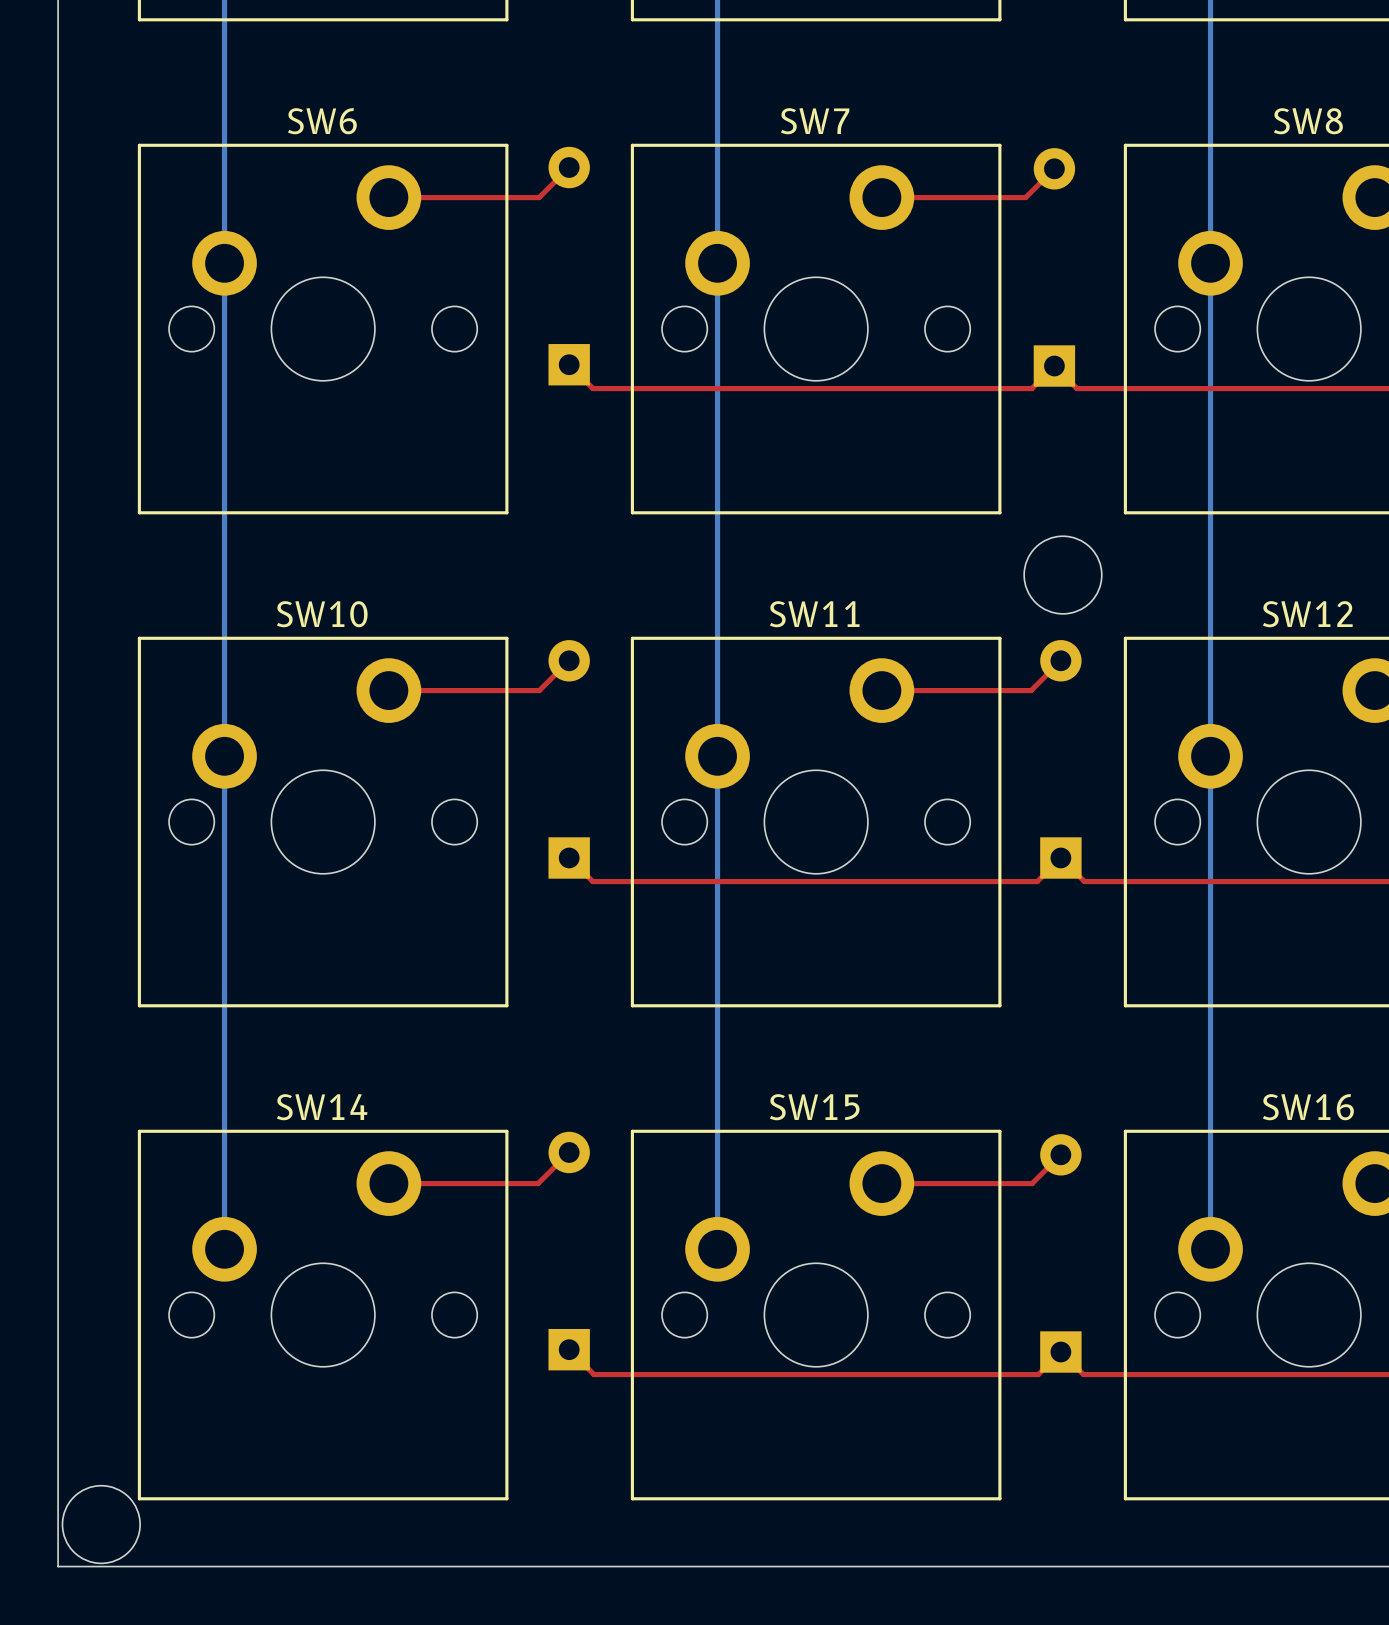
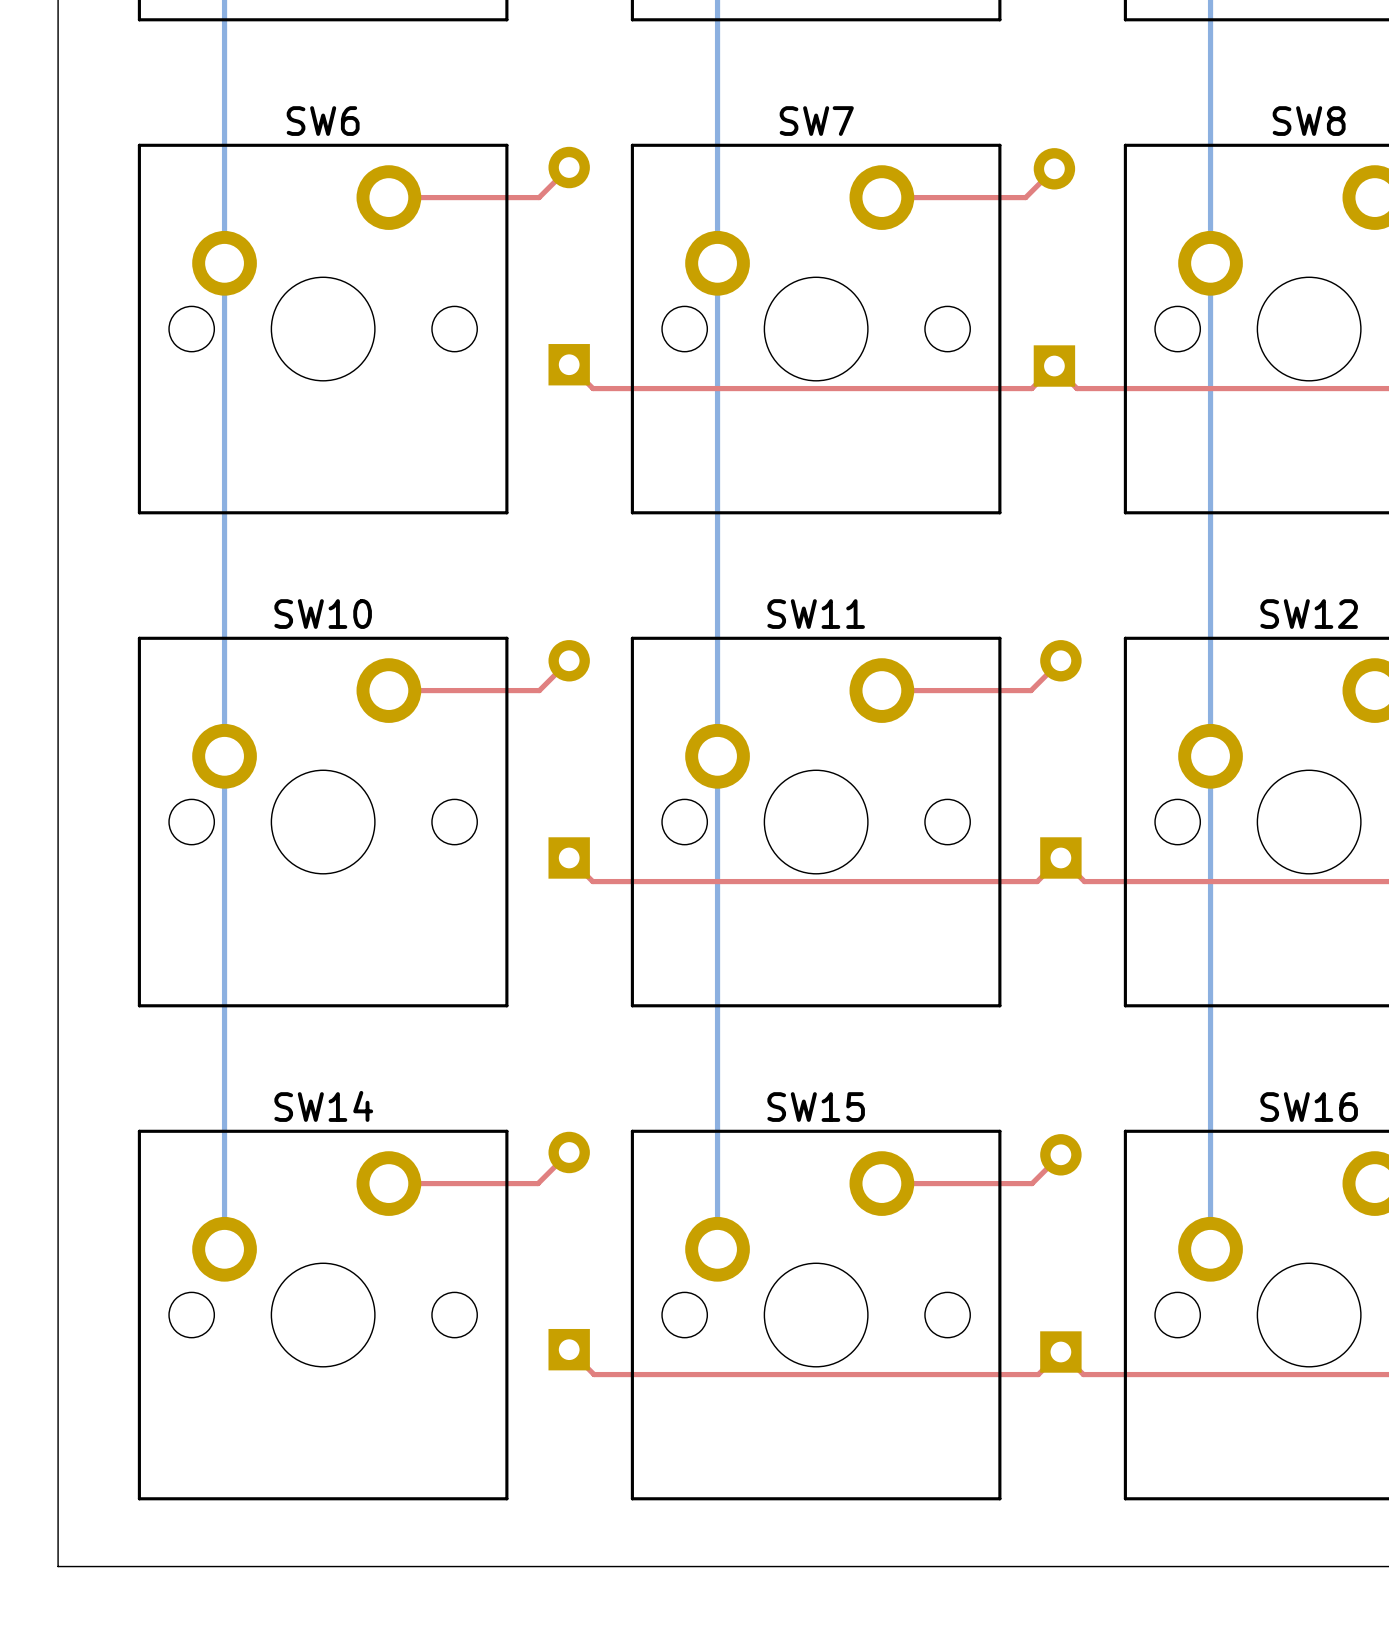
round board edge: [1023, 535, 1103, 615] -> none
round board edge: [61, 1485, 141, 1565] -> none

